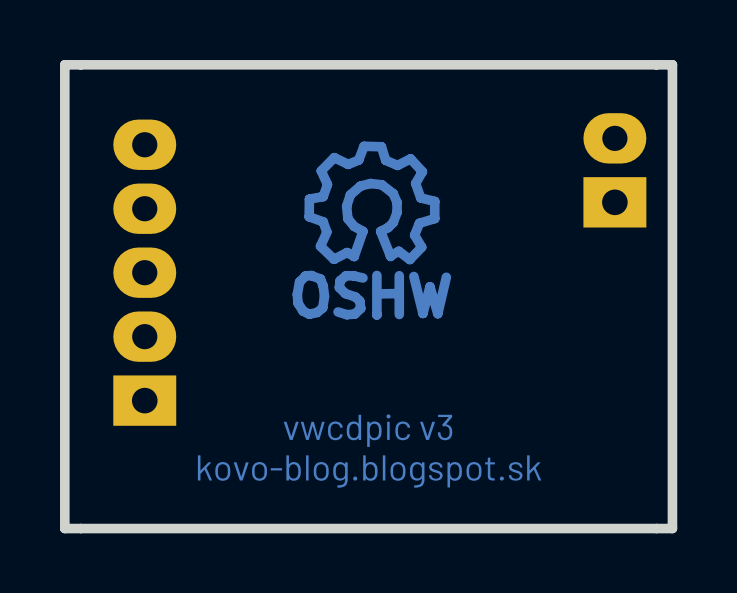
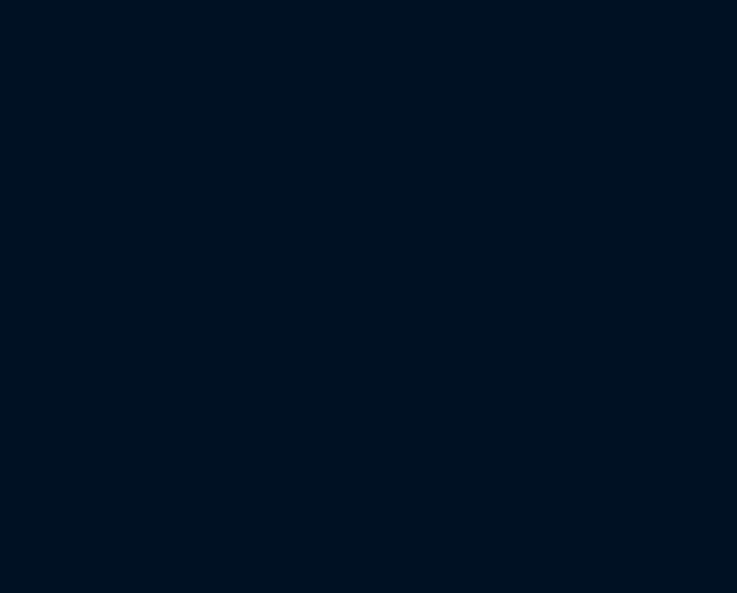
board edge: (672, 64) (64, 64) (64, 528) (672, 528) (672, 64) -> none
drawing: [292, 141, 452, 320] -> none
part: (614, 170) -> none
part: (144, 272) -> none
text: vwcdpic v3 (368, 430) -> none
text: kovo-blog.blogspot.sk (369, 471) -> none

